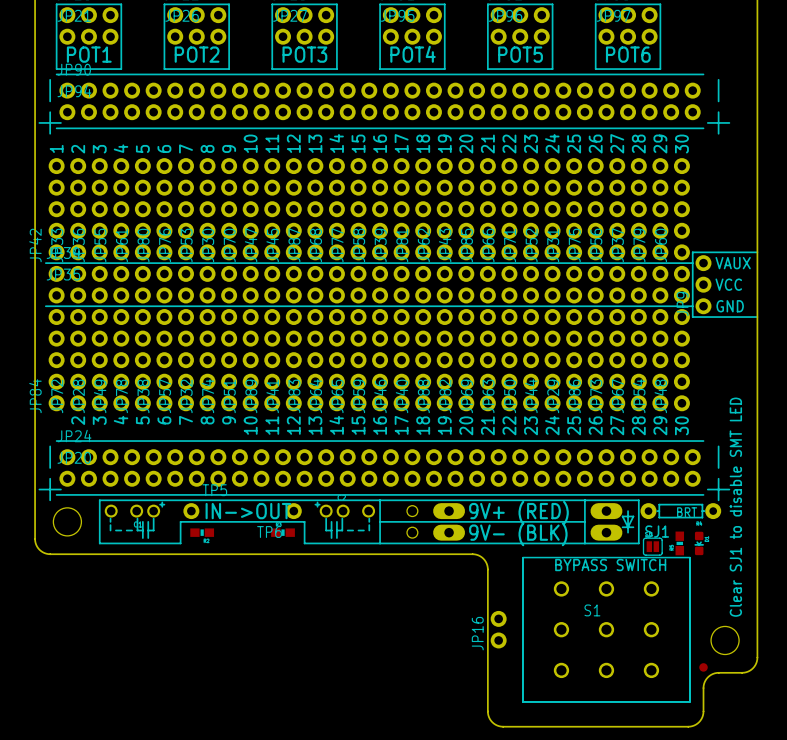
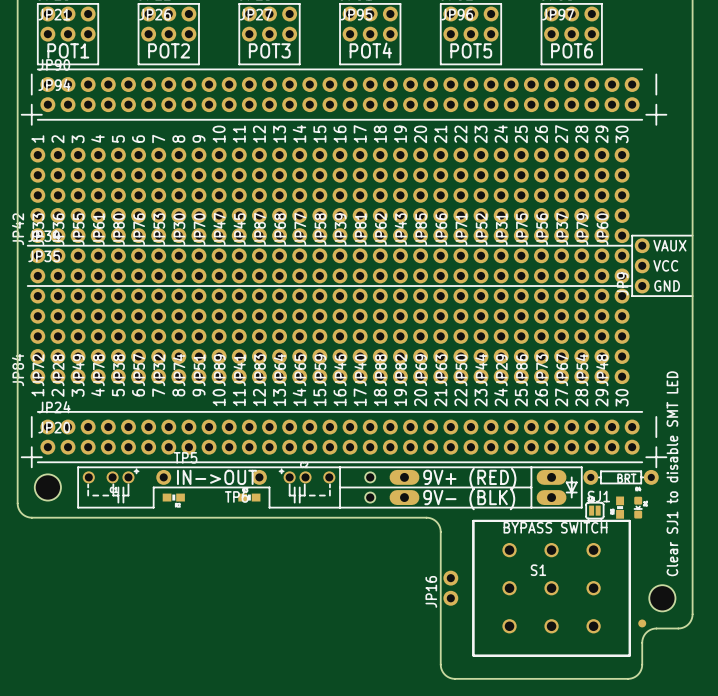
text: none -> 1 (37, 392)

